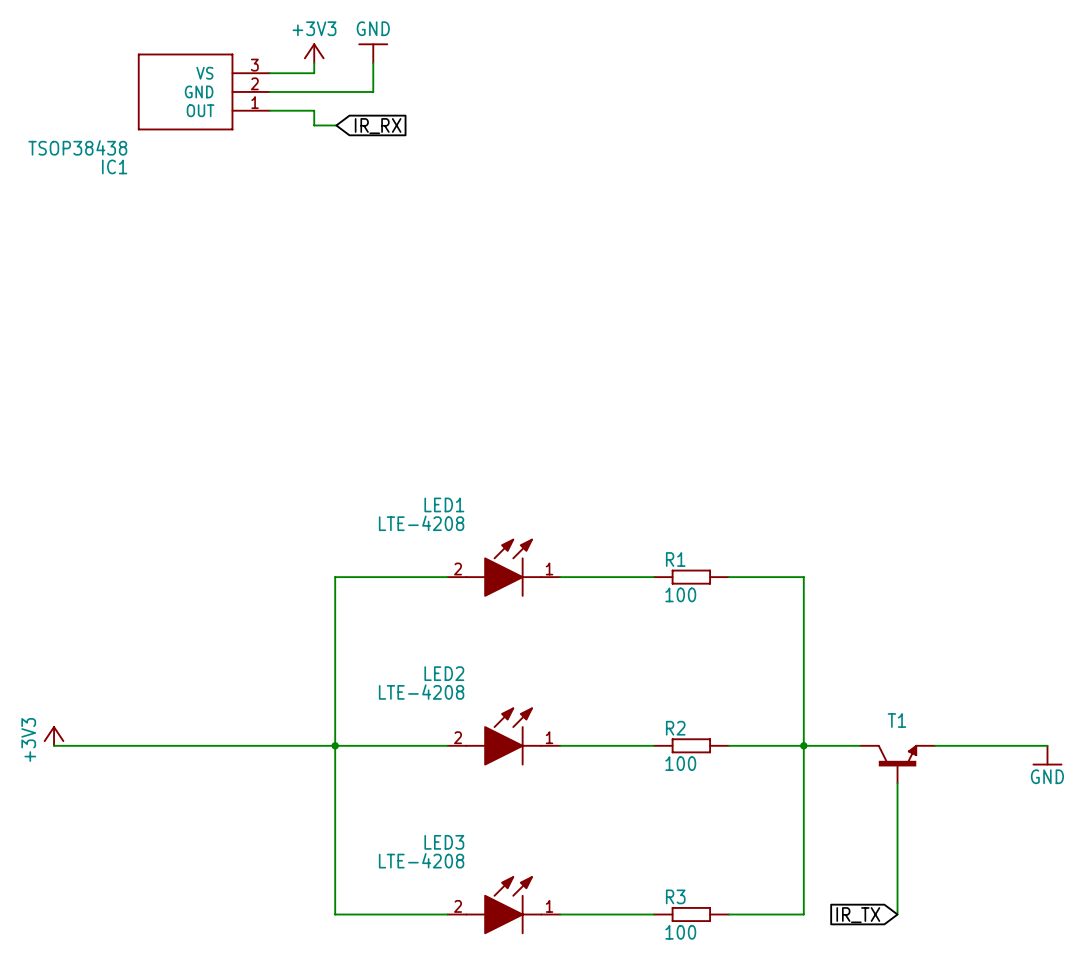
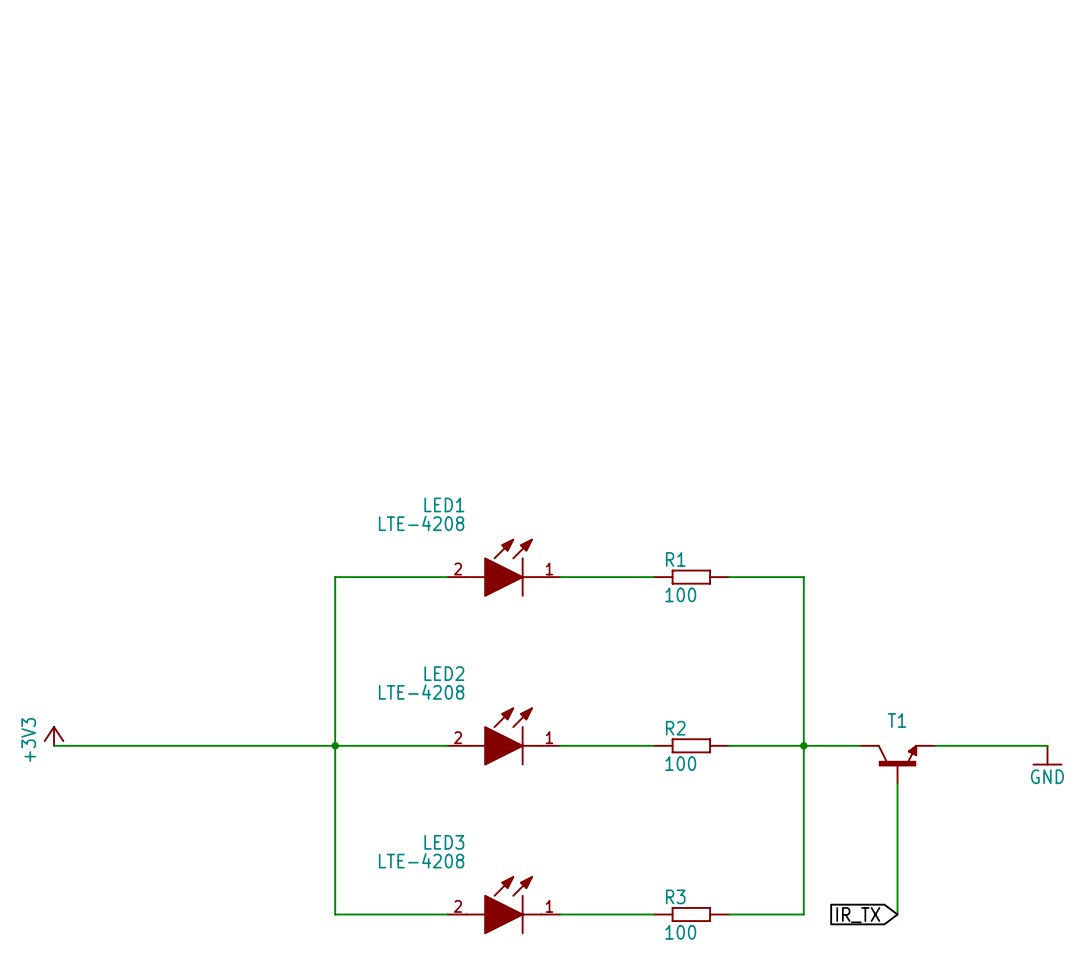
power symbol: +3V3 (314, 53) -> none
power symbol: GND (373, 53) -> none
wire: (314, 63) (314, 73) (269, 73) -> none
wire: (373, 63) (373, 91) (269, 91) -> none
IC1: TSOP38438 (203, 91) -> none
wire: (269, 110) (314, 110) (314, 125) (336, 125) -> none
global label: IR_RX (378, 126) -> none

